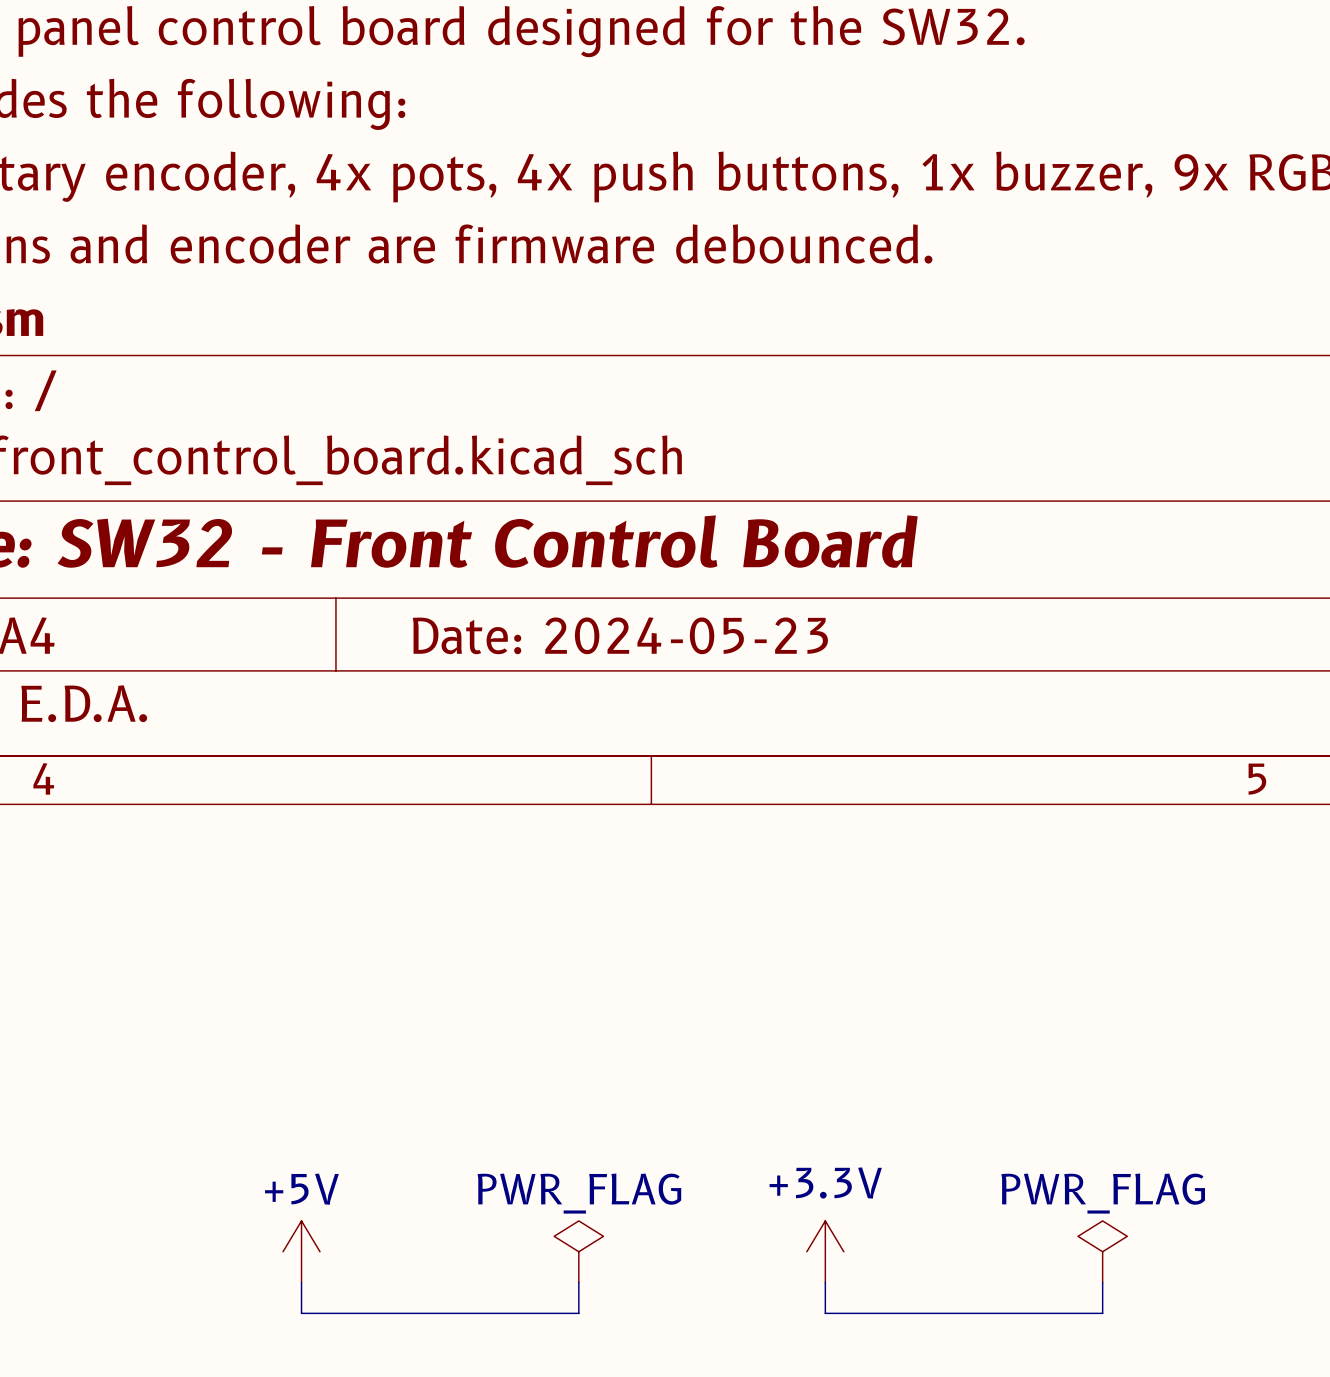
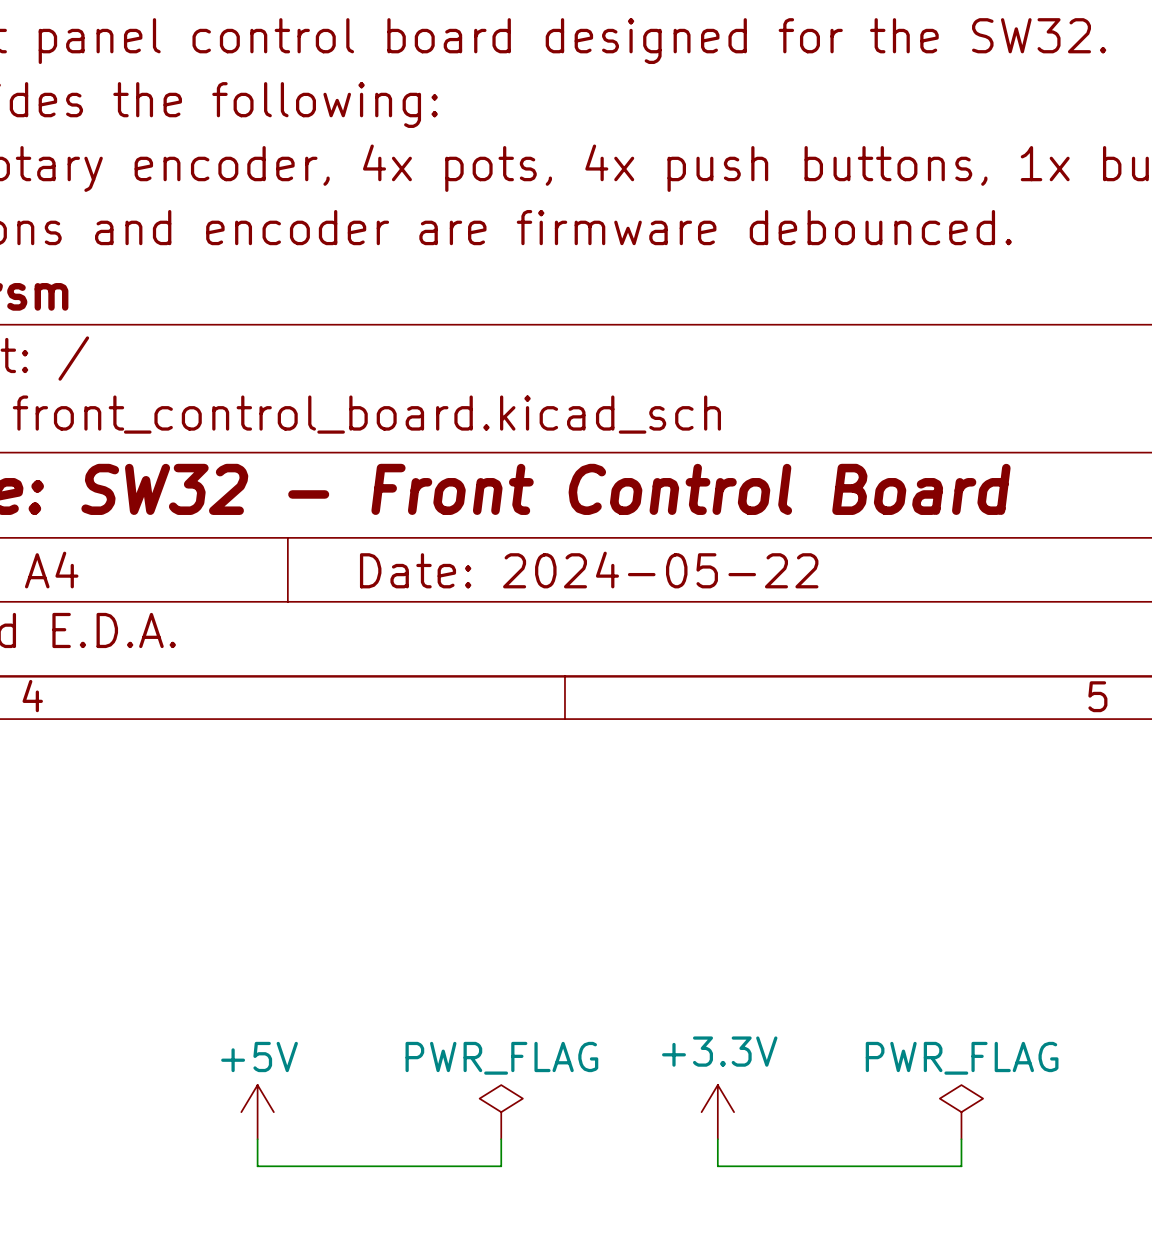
title block: Date: 2024-05-23 (620, 635) -> Date: 2024-05-22 (589, 570)

